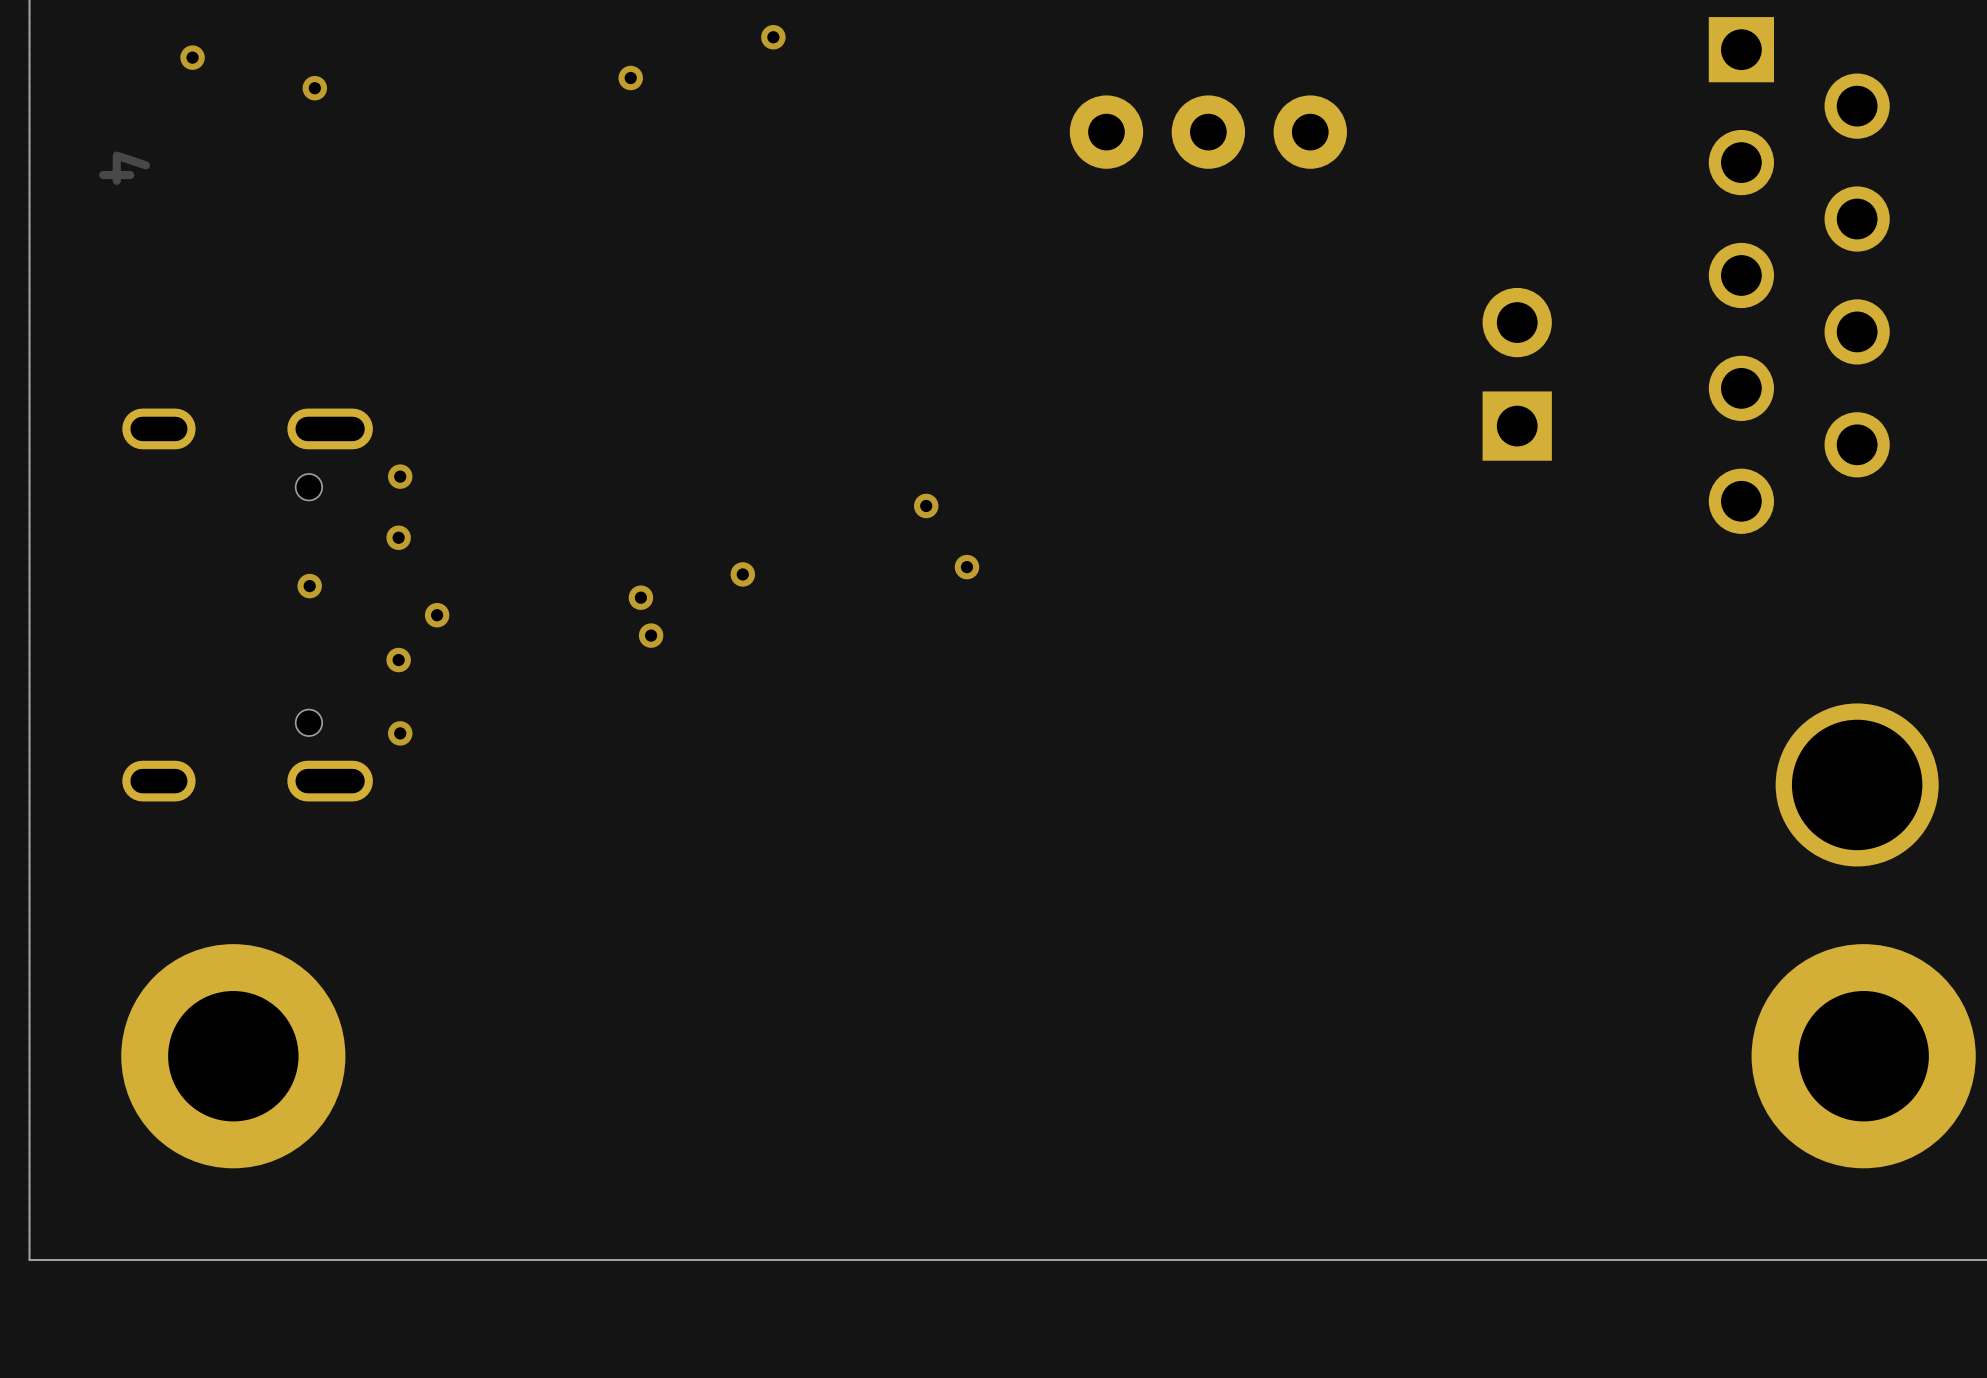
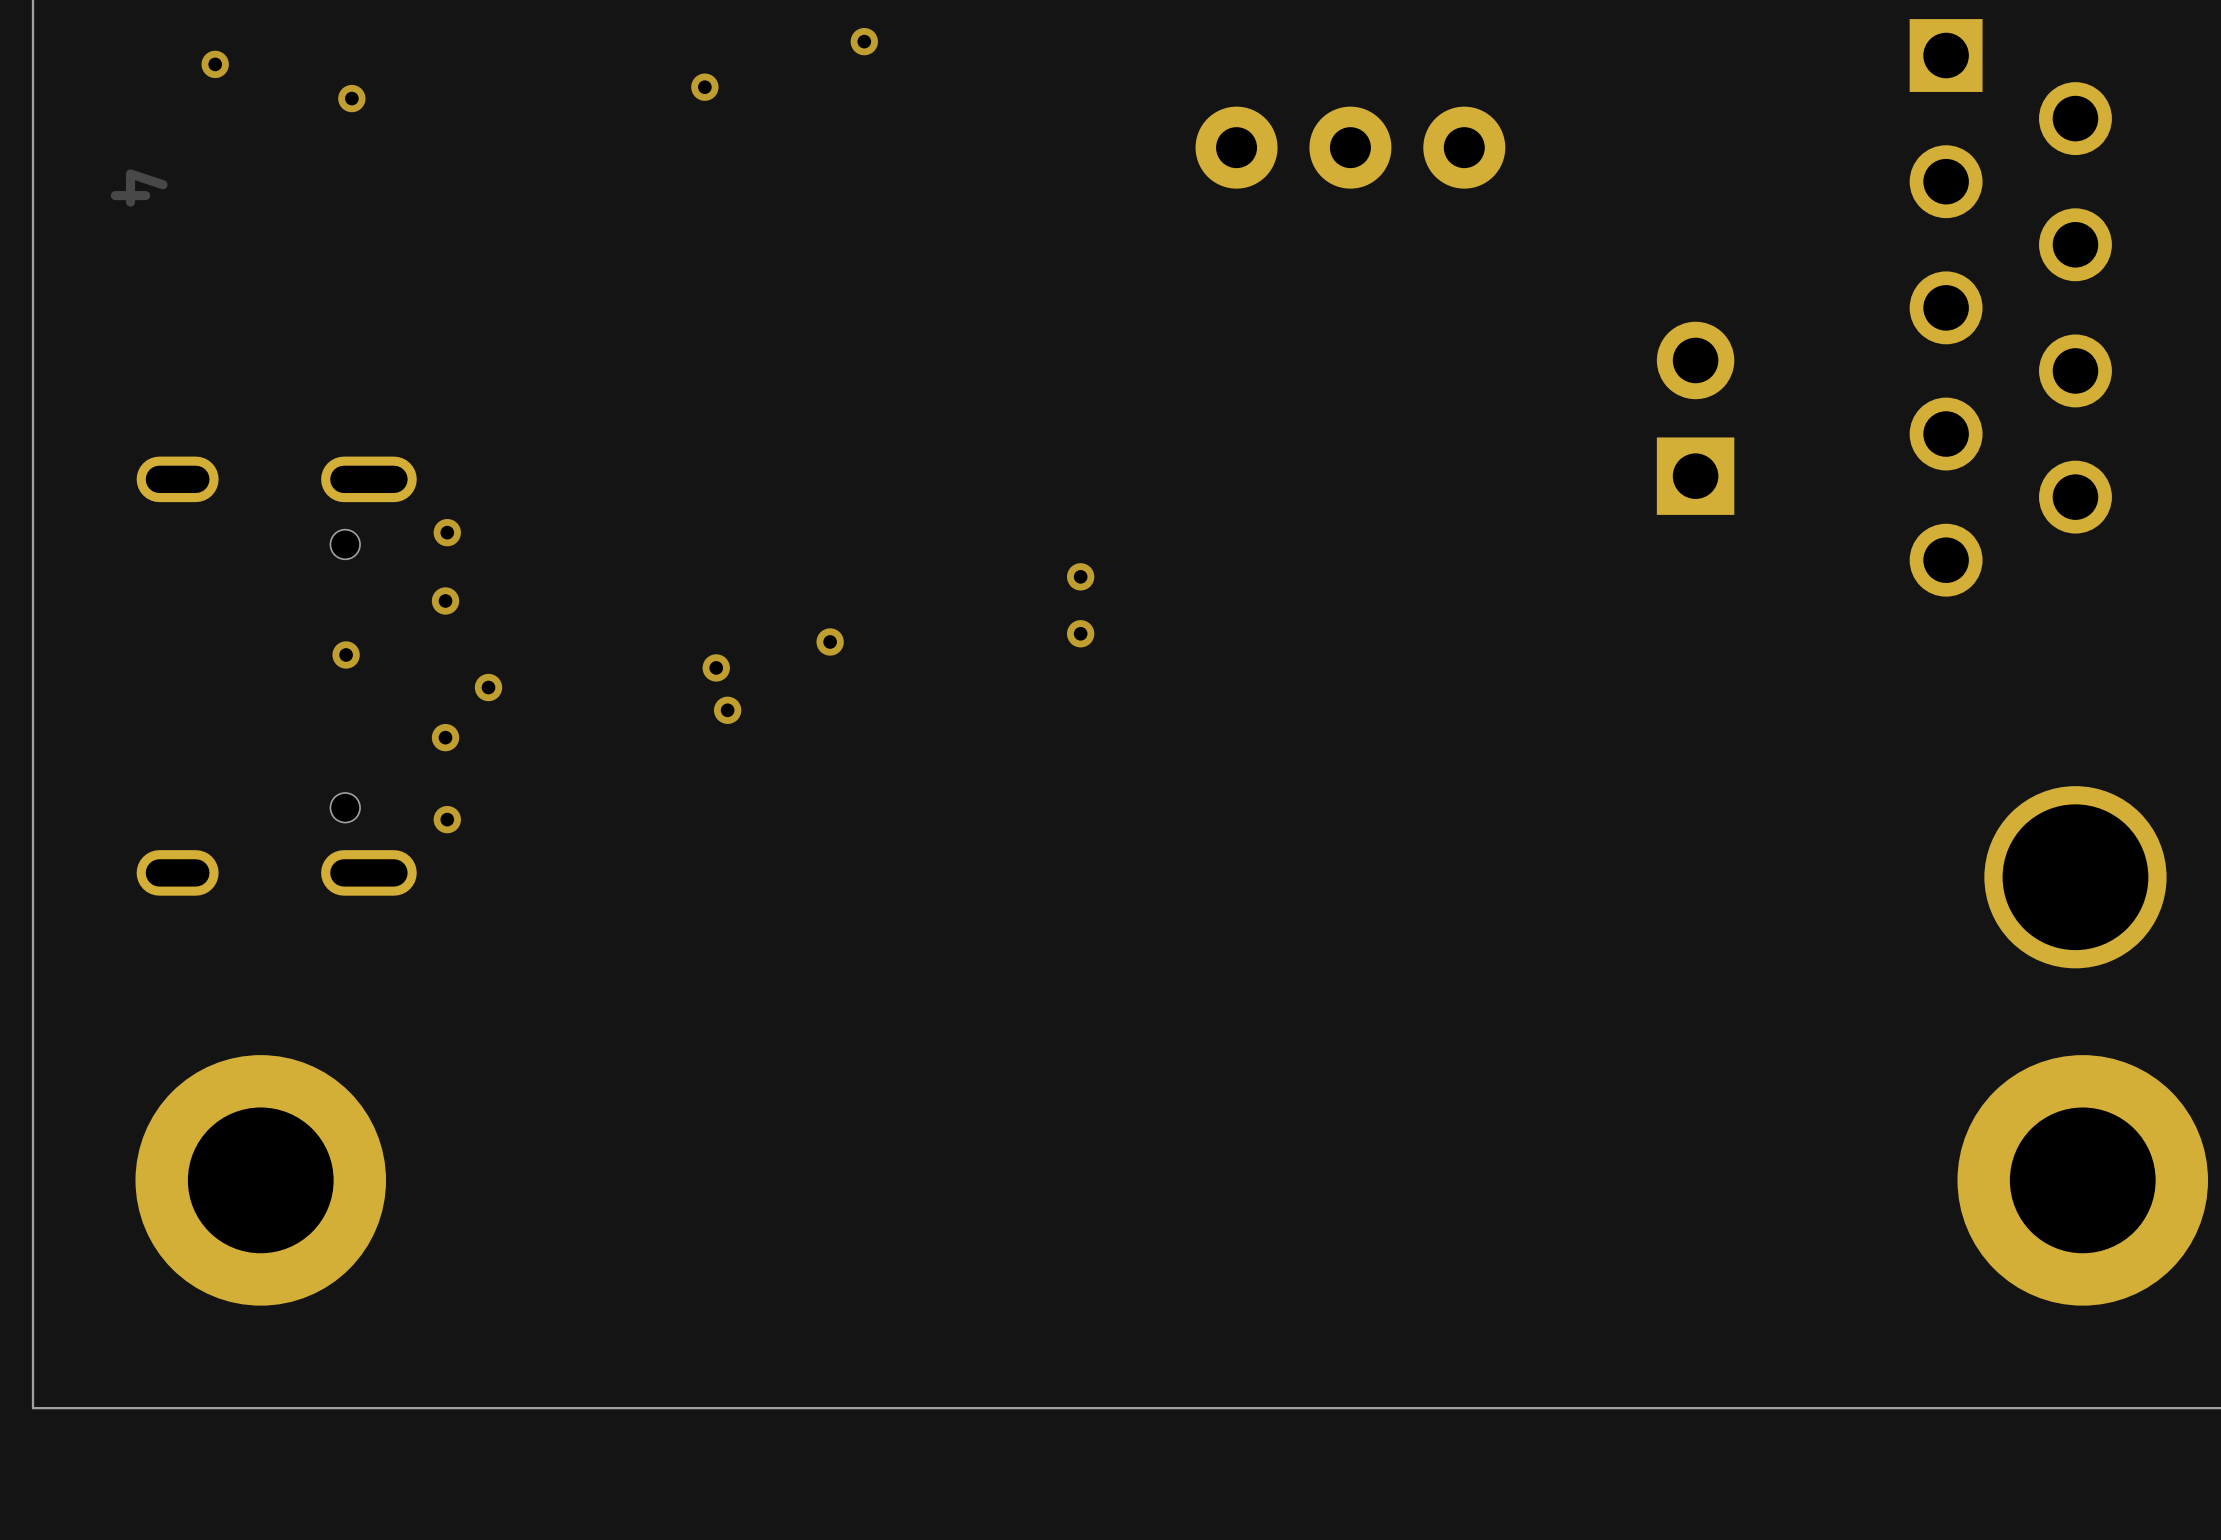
via position: (926, 505) -> (1080, 576)

